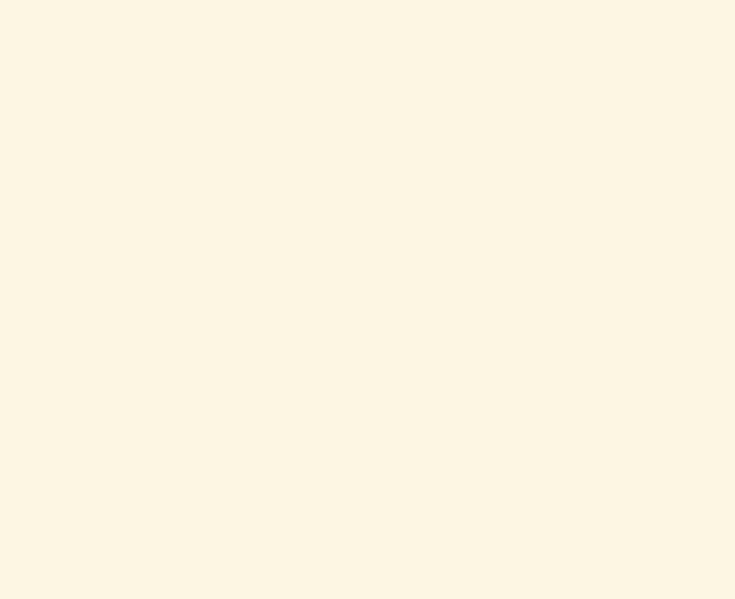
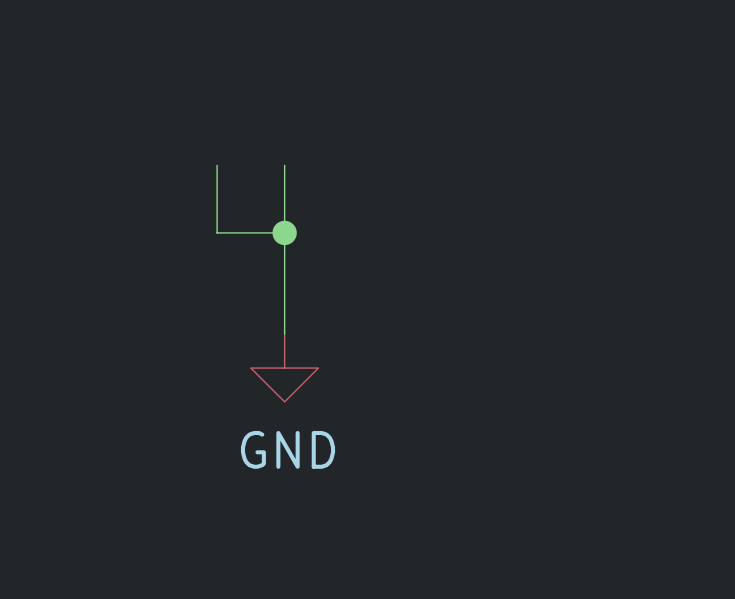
wire: none -> (217, 165) (217, 232) (284, 232)
wire: none -> (284, 165) (284, 334)
junction: none -> (284, 232)
power symbol: none -> GND (284, 368)

